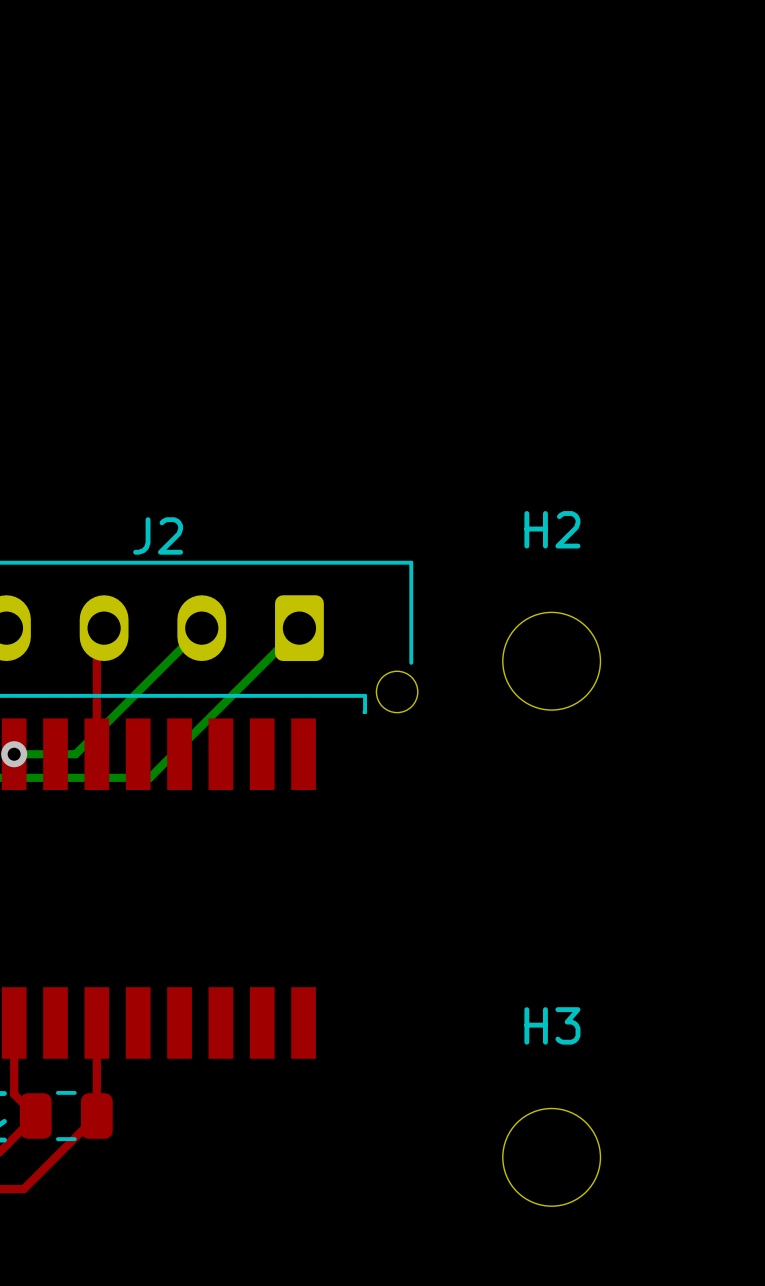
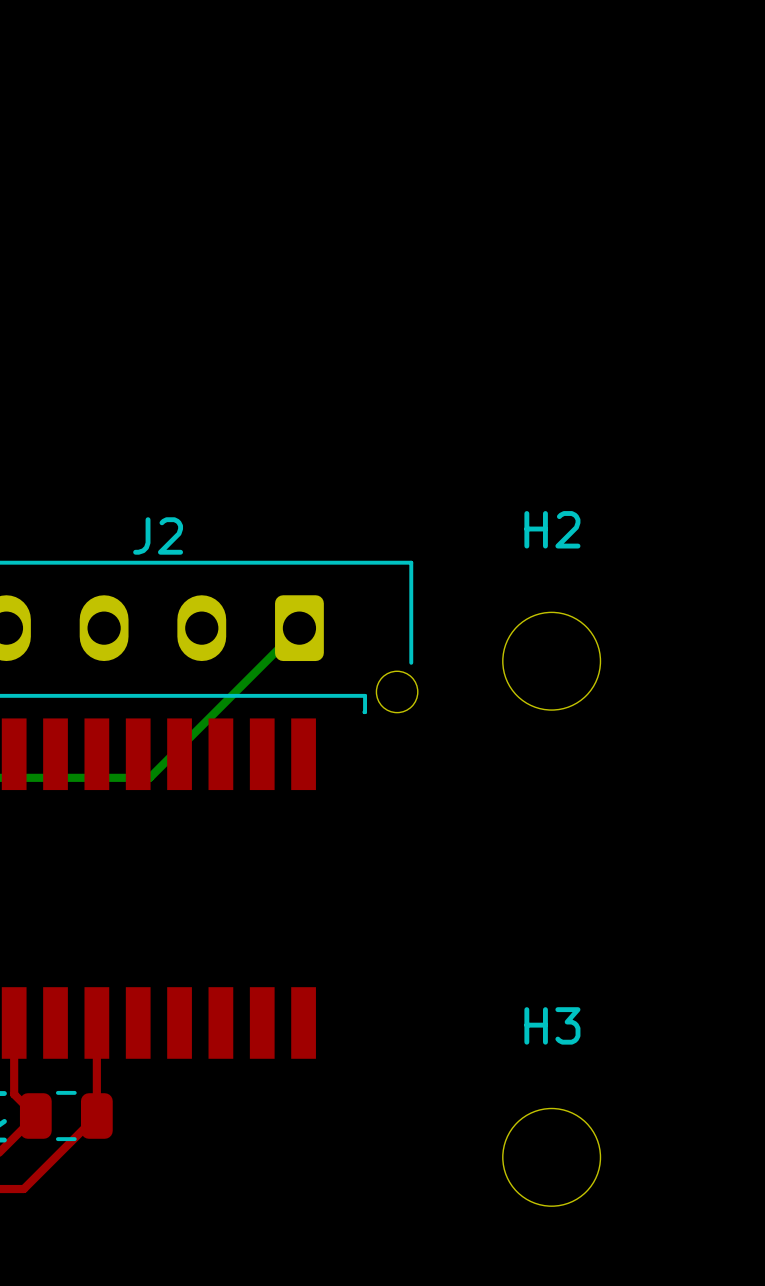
top track: (104, 628) (96, 635) (96, 754) -> none
bottom track: (201, 628) (75, 754) (14, 754) -> none
via: (14, 754) -> none

